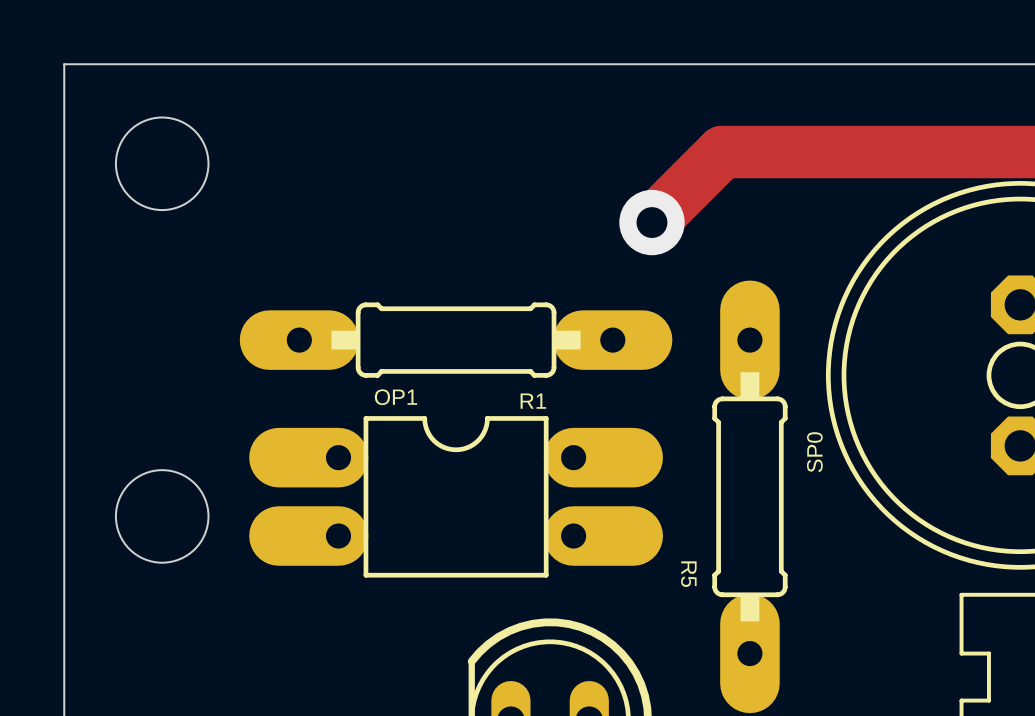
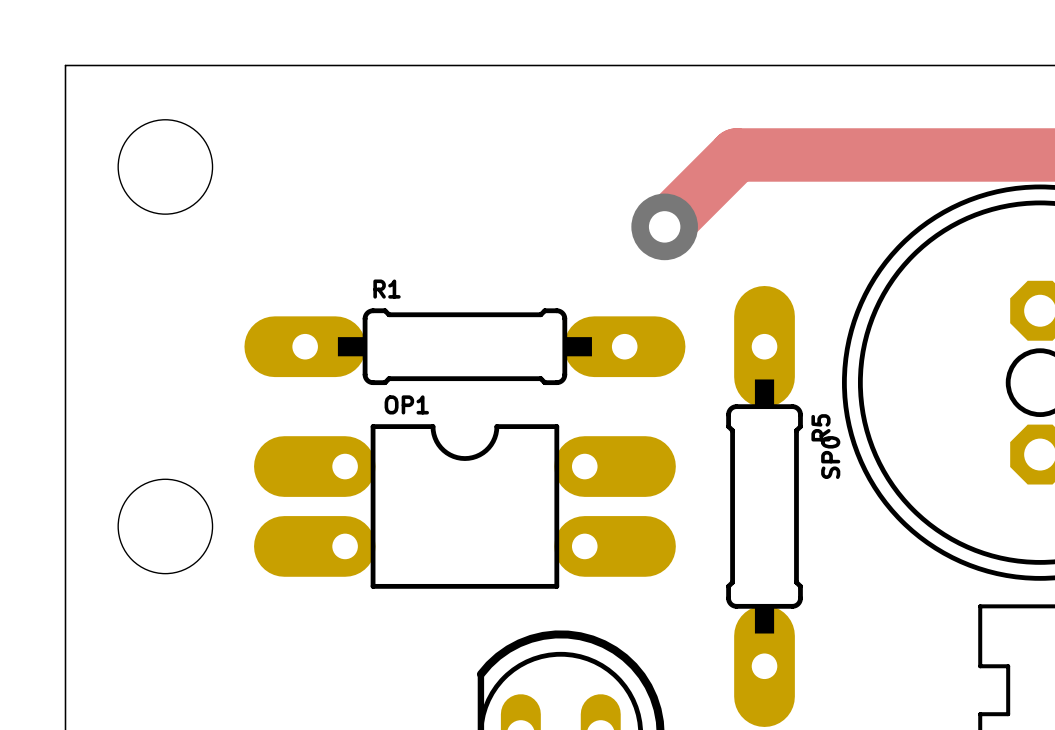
R1 name position: R1 (533, 401) -> R1 (387, 289)
R5 name rotation: 0° (688, 574) -> 180° (820, 427)
R5 name position: R5 (688, 574) -> R5 (820, 427)

